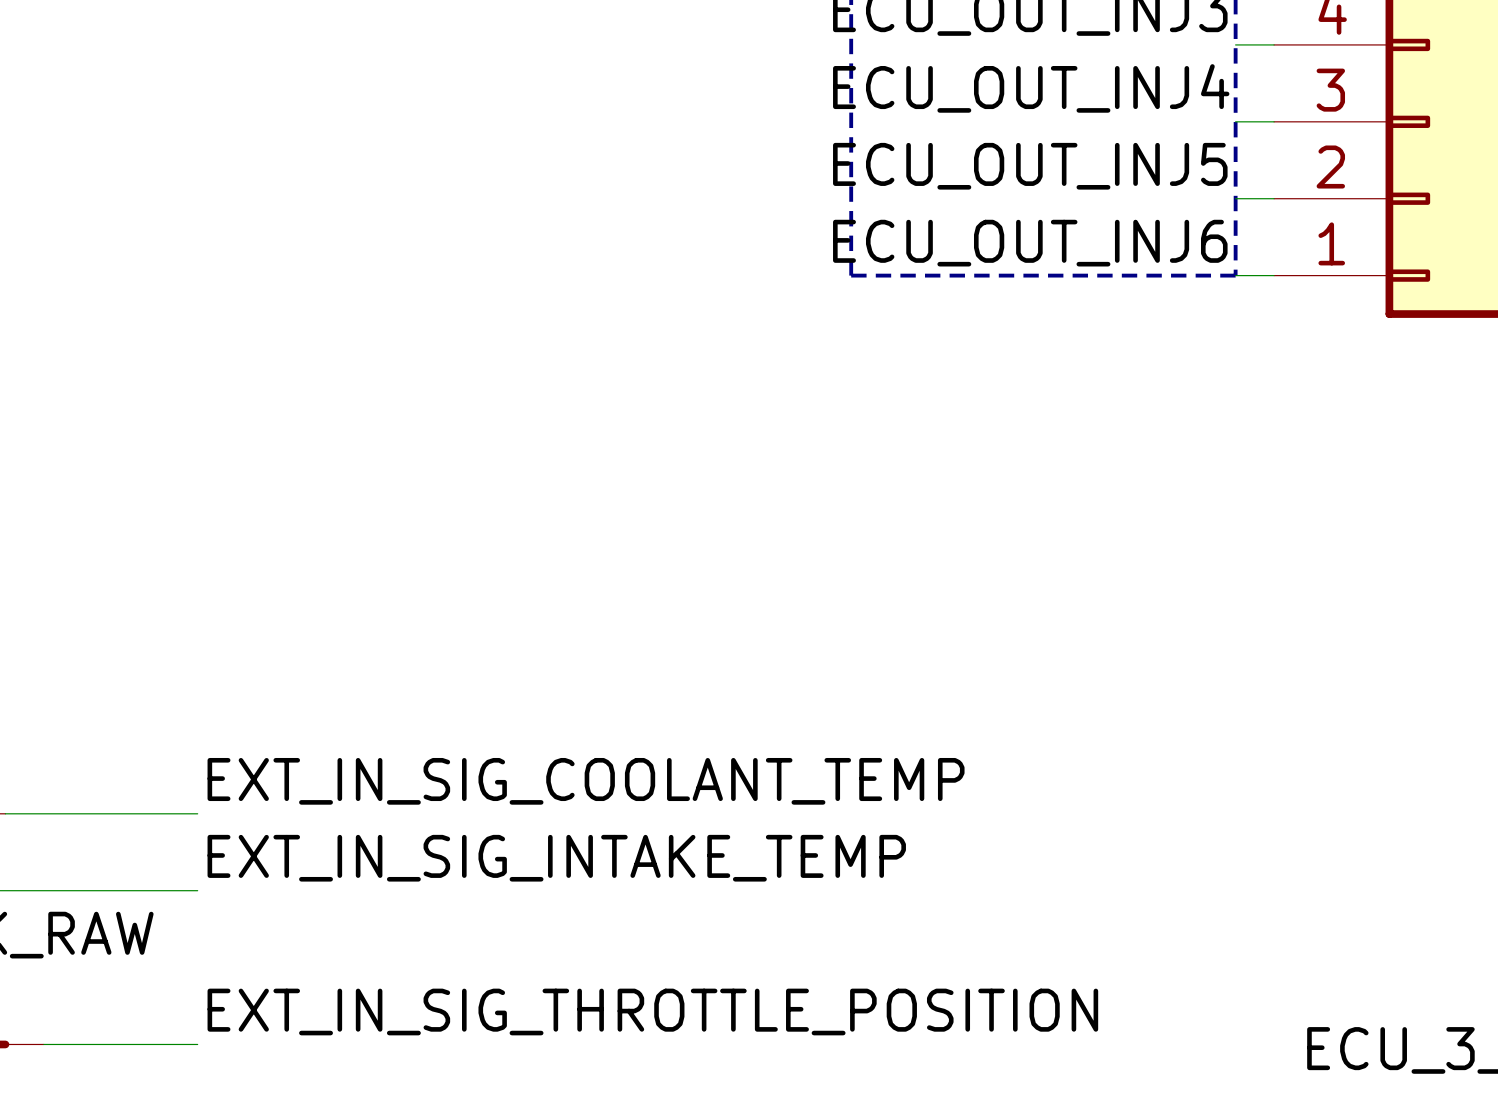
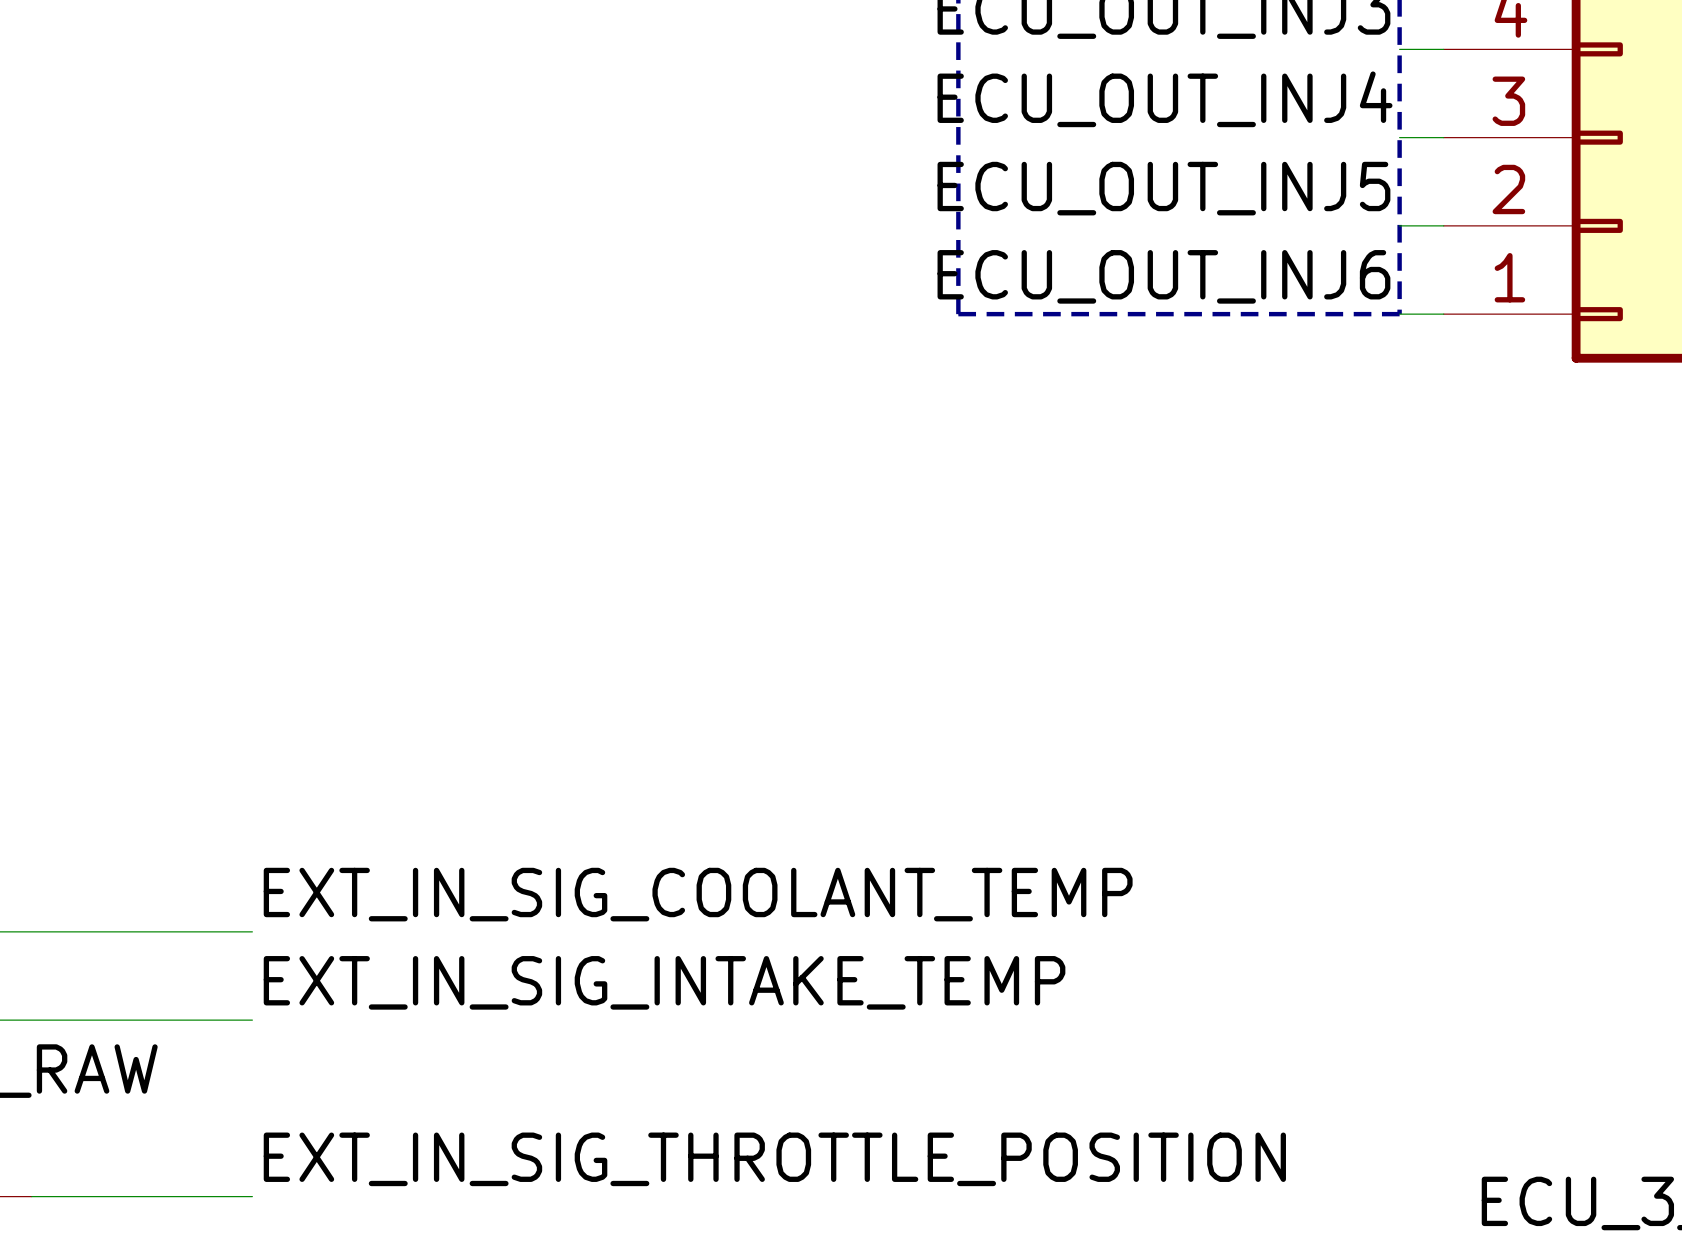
label position: EXT_IN_SIG_COOLANT_TEMP (586, 781) -> EXT_IN_SIG_COOLANT_TEMP (698, 894)
wire: none -> (208, 931) (252, 931)
label position: EXT_IN_SIG_INTAKE_TEMP (556, 858) -> EXT_IN_SIG_INTAKE_TEMP (664, 982)
wire: none -> (208, 1020) (252, 1020)
label position: EXT_IN_SIG_THROTTLE_POSITION (652, 1011) -> EXT_IN_SIG_THROTTLE_POSITION (774, 1159)
wire: none -> (208, 1196) (252, 1196)

